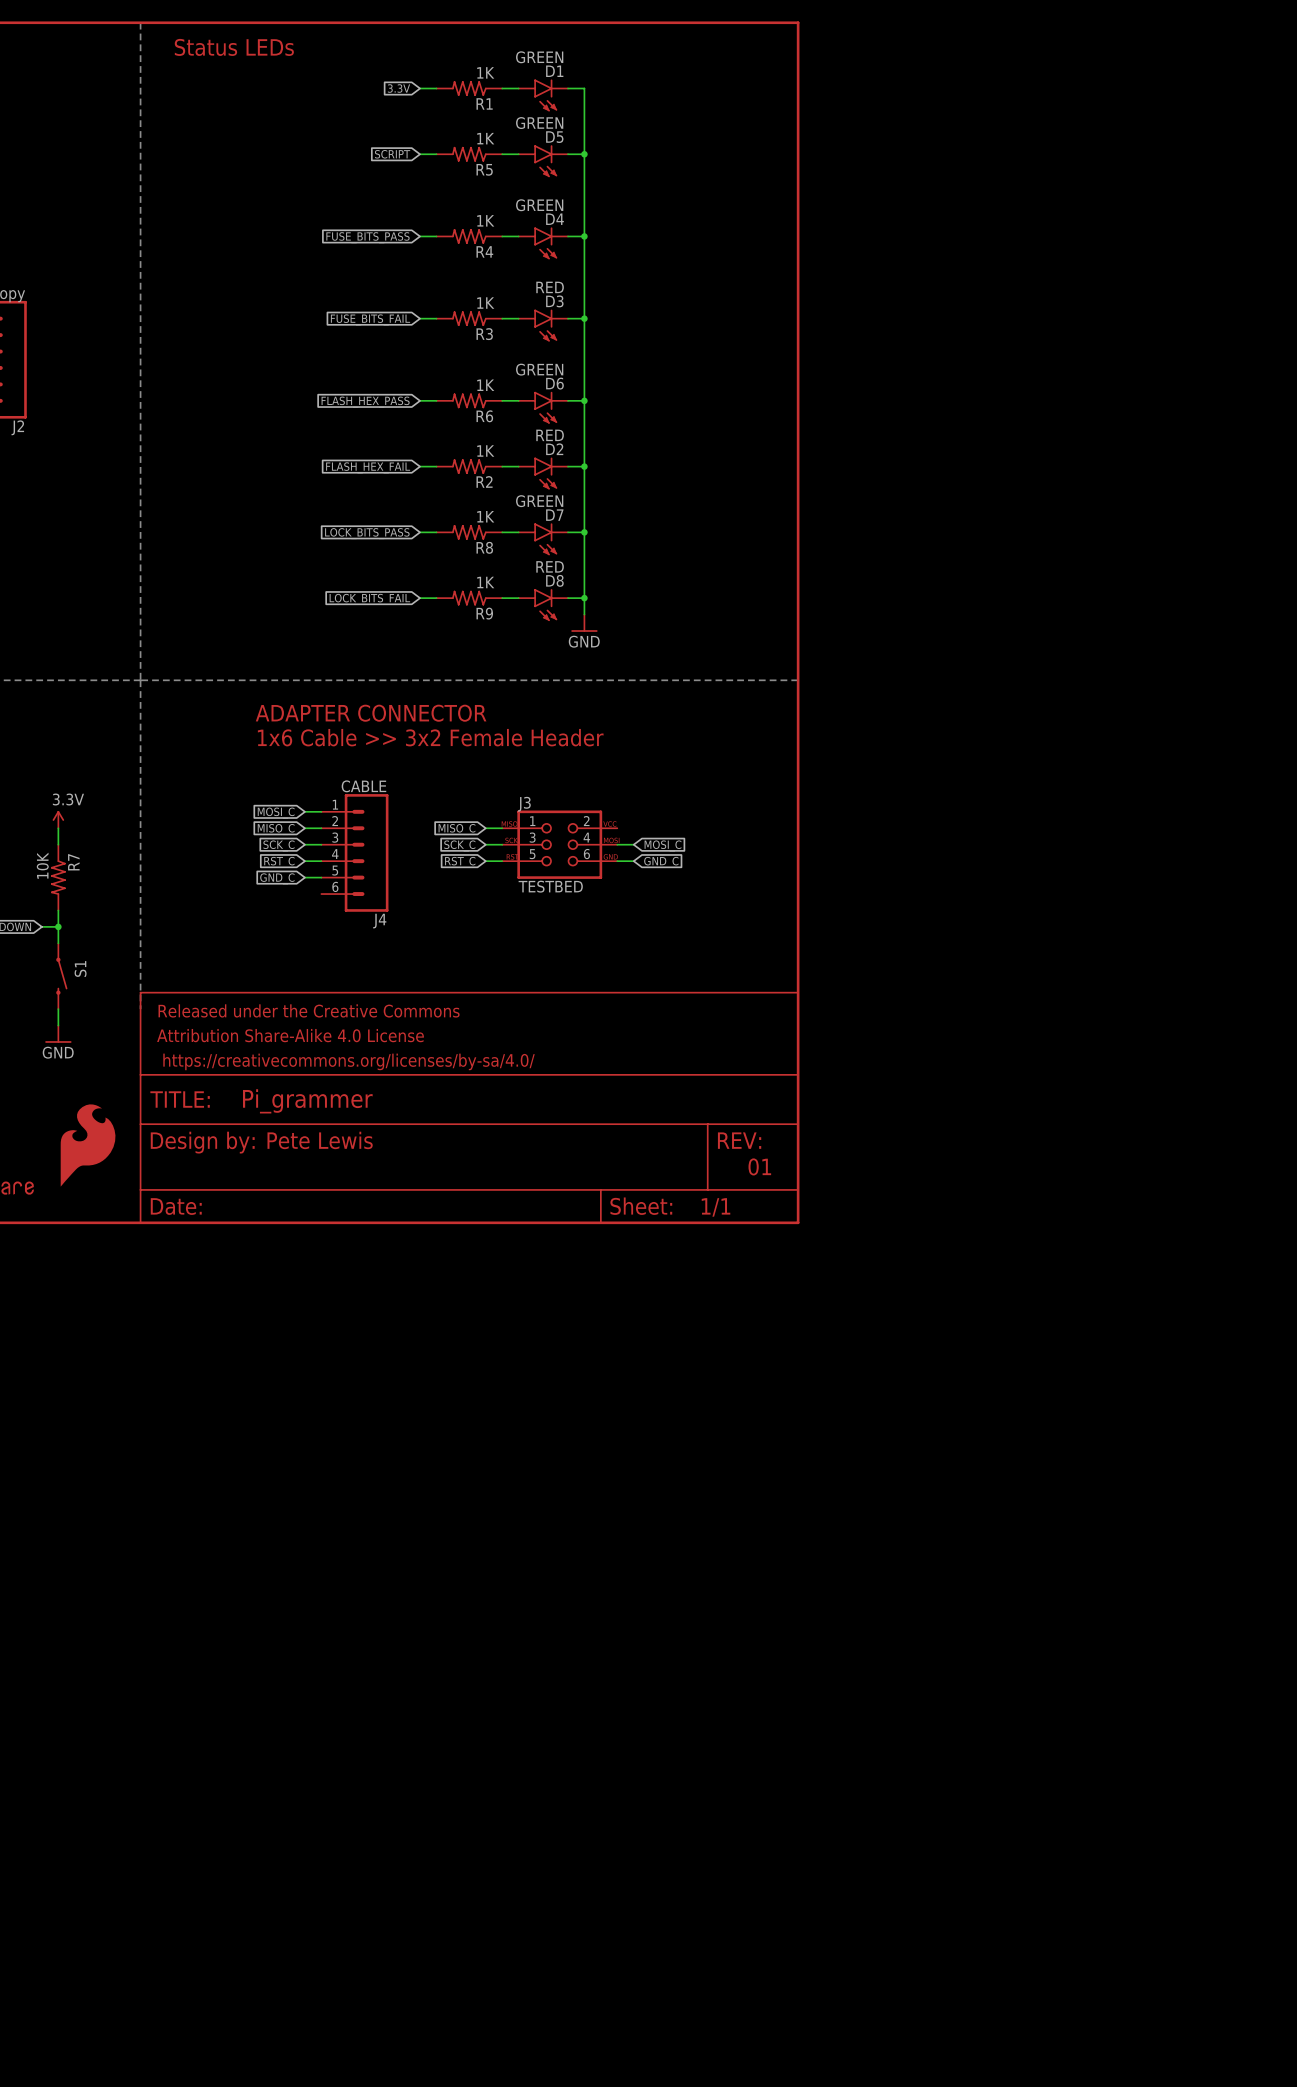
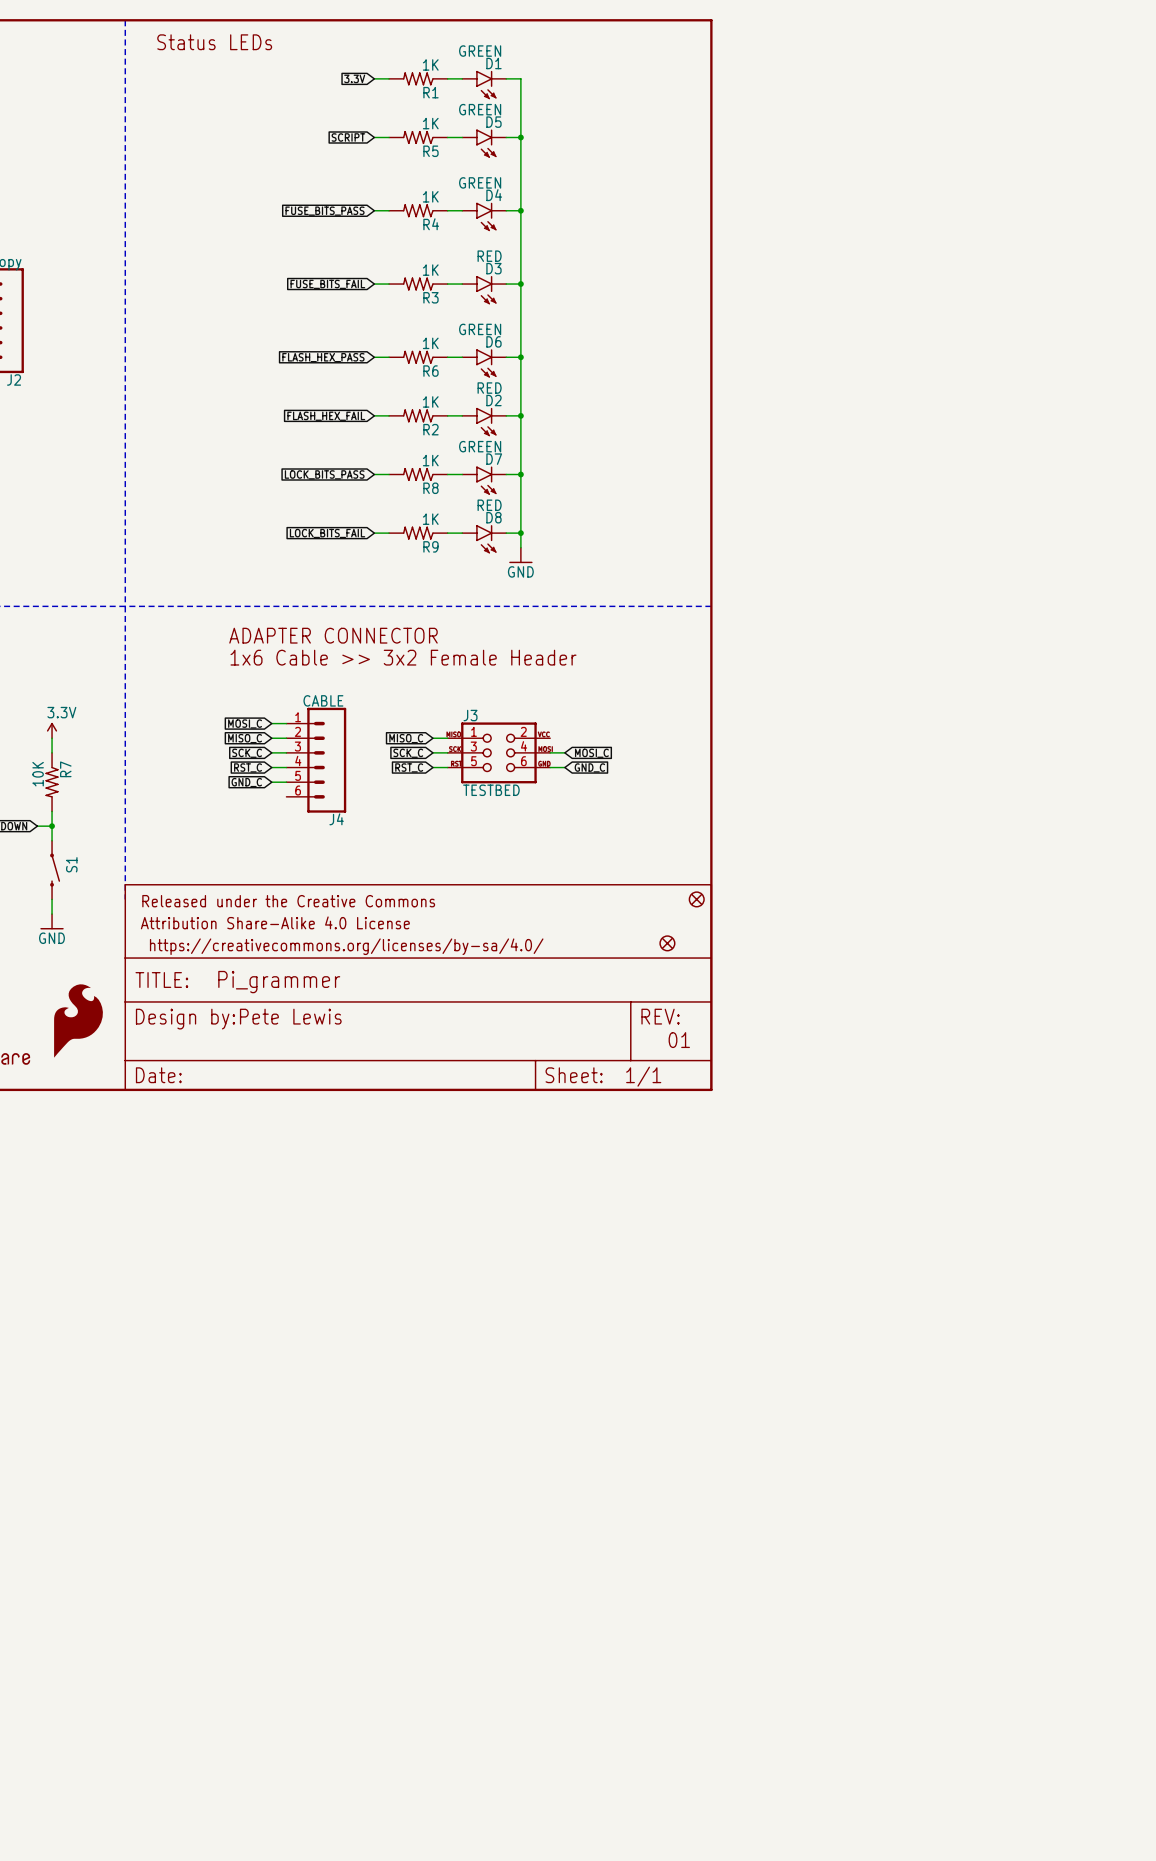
part: none -> (696, 899)
part: none -> (667, 943)

